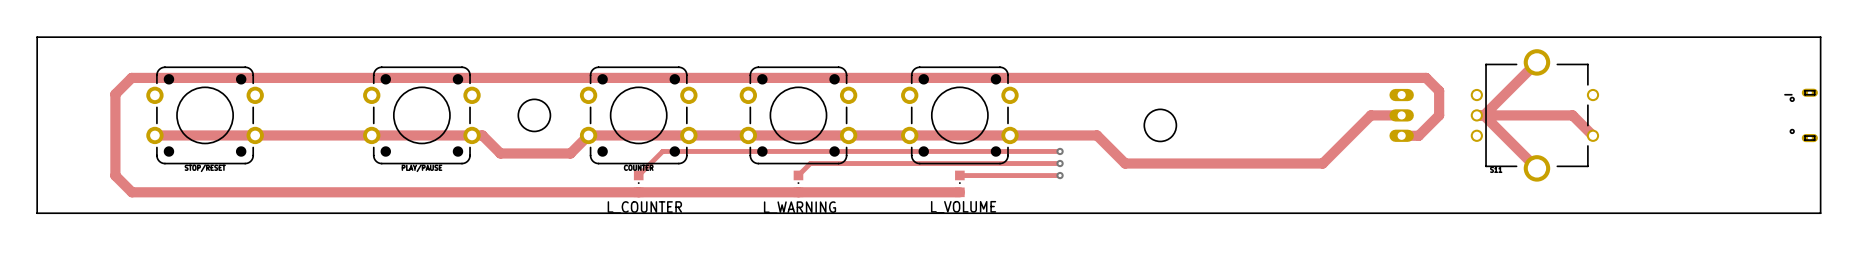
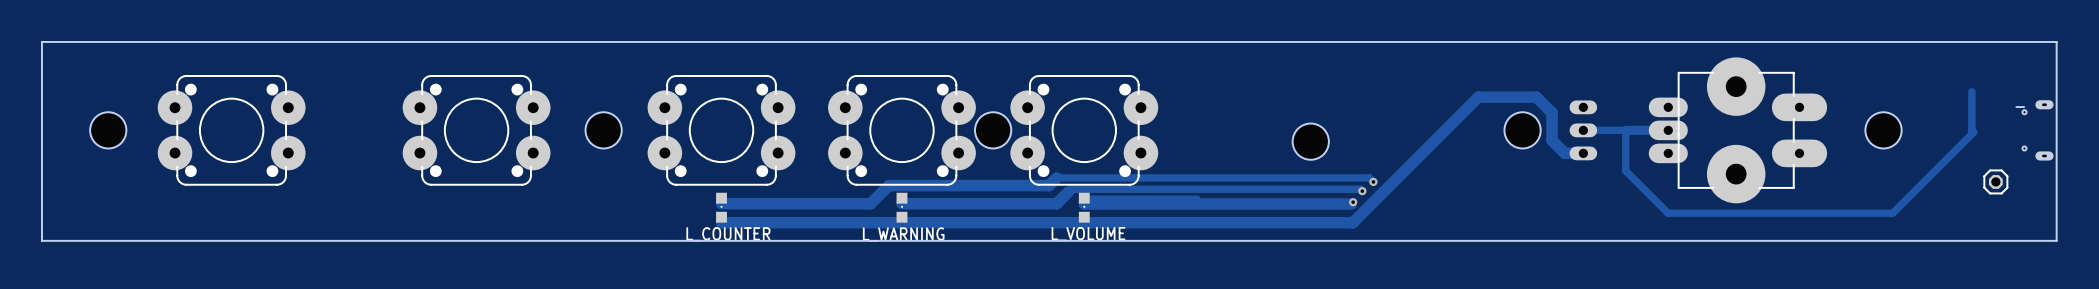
track: (1536, 62) (1483, 115) (1536, 168) -> none
part footprint: [739, 66, 858, 165] -> [828, 75, 976, 186]
part footprint: [901, 66, 1019, 165] -> [1010, 75, 1159, 186]
track: none -> (1971, 91) (1971, 130) (1973, 132) (1892, 213) (1668, 213) (1625, 170) (1625, 130)
hole: none -> (108, 130)
part: (205, 115) -> none
part: none -> (231, 130)
part: (421, 115) -> none
part: none -> (476, 130)
part: (638, 115) -> none
part: none -> (721, 130)
hole: none -> (993, 130)
hole: none -> (1522, 130)
track: (1401, 115) (1370, 115) (1322, 163) (1125, 163) (1097, 135) (588, 135) (570, 153) (500, 153) (482, 135) (154, 135) -> (1583, 130) (1625, 130)
track: (1476, 115) (1572, 115) (1593, 135) -> (1668, 130) (1625, 130)
part: (1534, 115) -> none
part: none -> (1737, 130)
hole: none -> (1883, 130)
track: (1401, 135) (1418, 135) (1439, 115) (1439, 90) (1426, 77) (131, 77) (115, 94) (115, 175) (131, 192) (959, 192) -> (1583, 153) (1564, 153) (1552, 140) (1552, 112) (1536, 97) (1478, 97) (1352, 222) (721, 222)
track: (1060, 151) (662, 151) (638, 175) -> none
via: (1060, 151) -> none
track: none -> (1373, 181) (1369, 177) (1056, 177) (1048, 185) (888, 185) (870, 203) (721, 203)
via: none -> (1373, 181)
part: none -> (1995, 181)
track: (1060, 163) (810, 163) (798, 175) -> none
via: (1060, 163) -> none
track: none -> (1362, 191) (1360, 189) (1071, 189) (1056, 203) (901, 203)
via: none -> (1362, 191)
via: (1060, 175) -> none
track: none -> (1353, 202) (1351, 204) (1084, 203)
via: none -> (1353, 202)

